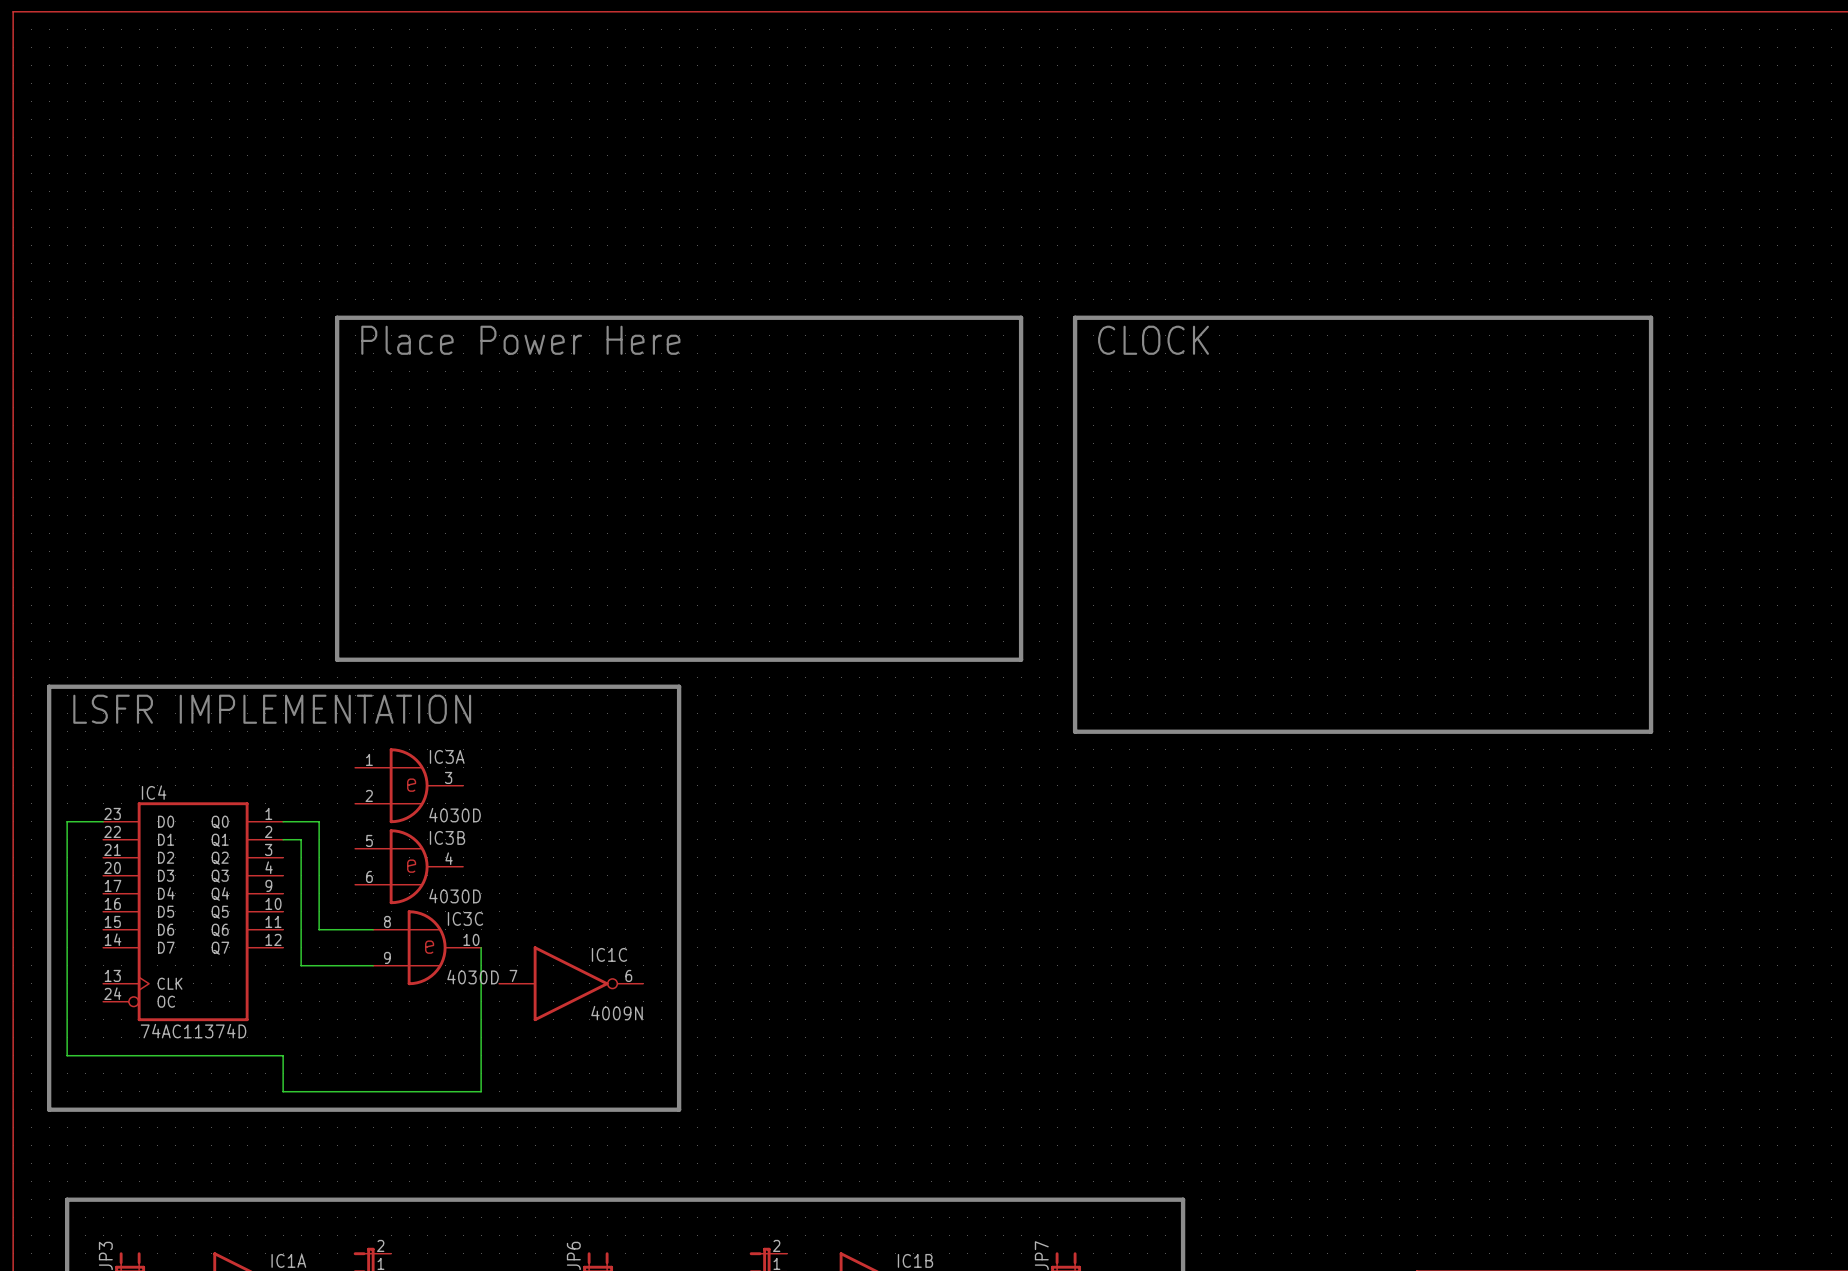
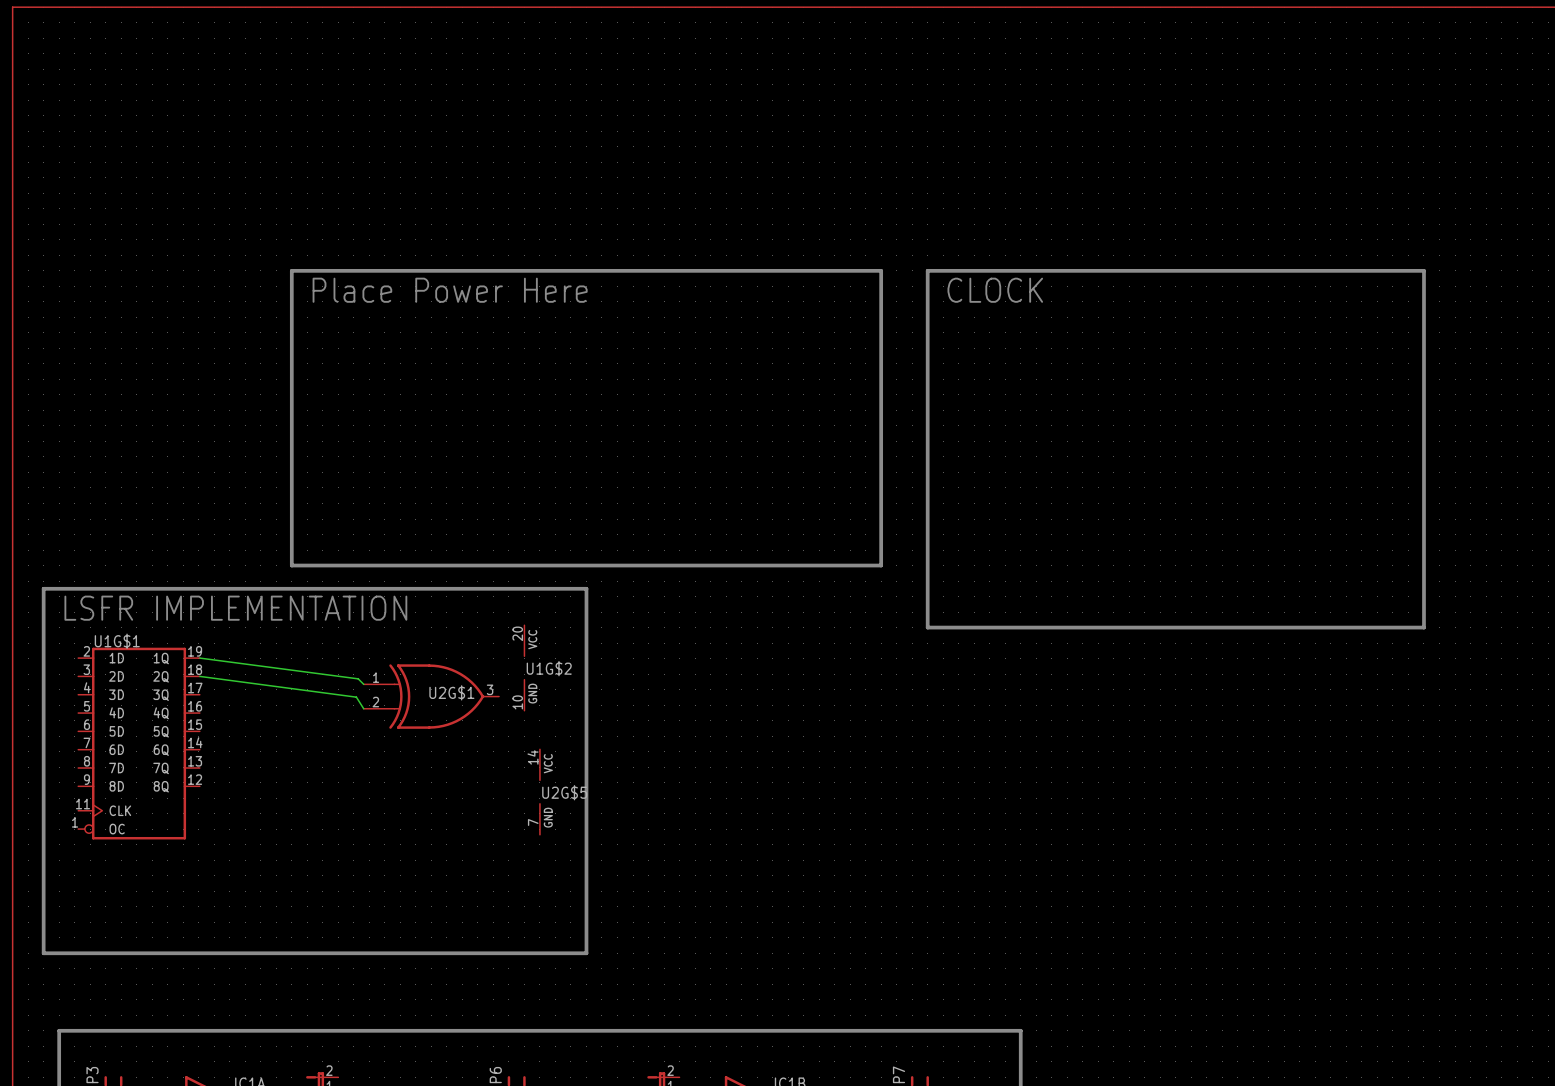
wire: none -> (199, 658) (358, 678) (363, 684)
U1G$2: none -> (524, 667)
IC3A: 4030D (409, 785) -> none
wire: none -> (199, 676) (356, 697) (363, 708)
U2G$1: none -> (431, 696)
wire: (103, 821) (67, 821) (67, 1055) (283, 1055) (283, 1091) (481, 1091) (481, 947) -> none
wire: (283, 821) (319, 821) (319, 929) (373, 929) -> none
wire: (283, 839) (301, 839) (301, 965) (373, 965) -> none
U1G$1: none -> (139, 743)
IC3B: 4030D (409, 866) -> none
IC4: 74AC11374D (193, 911) -> none
U2G$5: none -> (539, 792)
IC3C: 4030D (427, 947) -> none
IC1C: 4009N (571, 983) -> none

